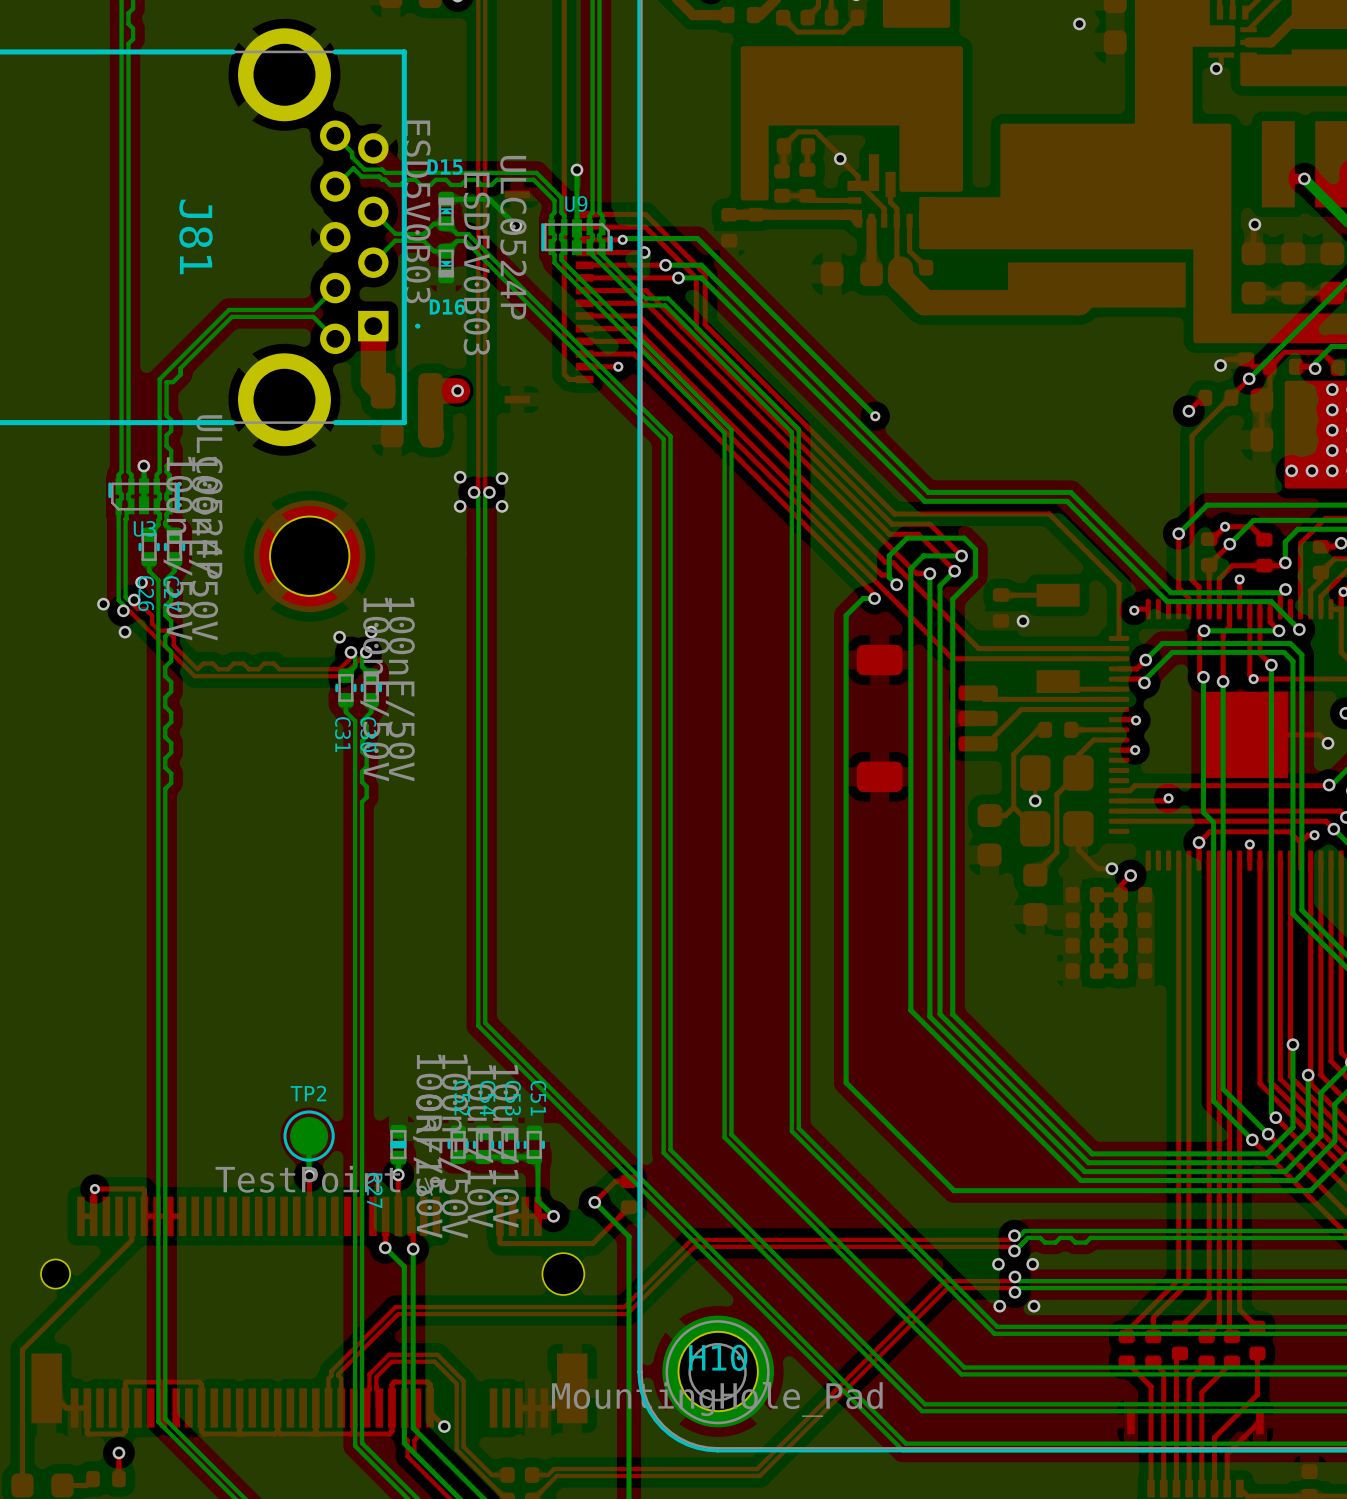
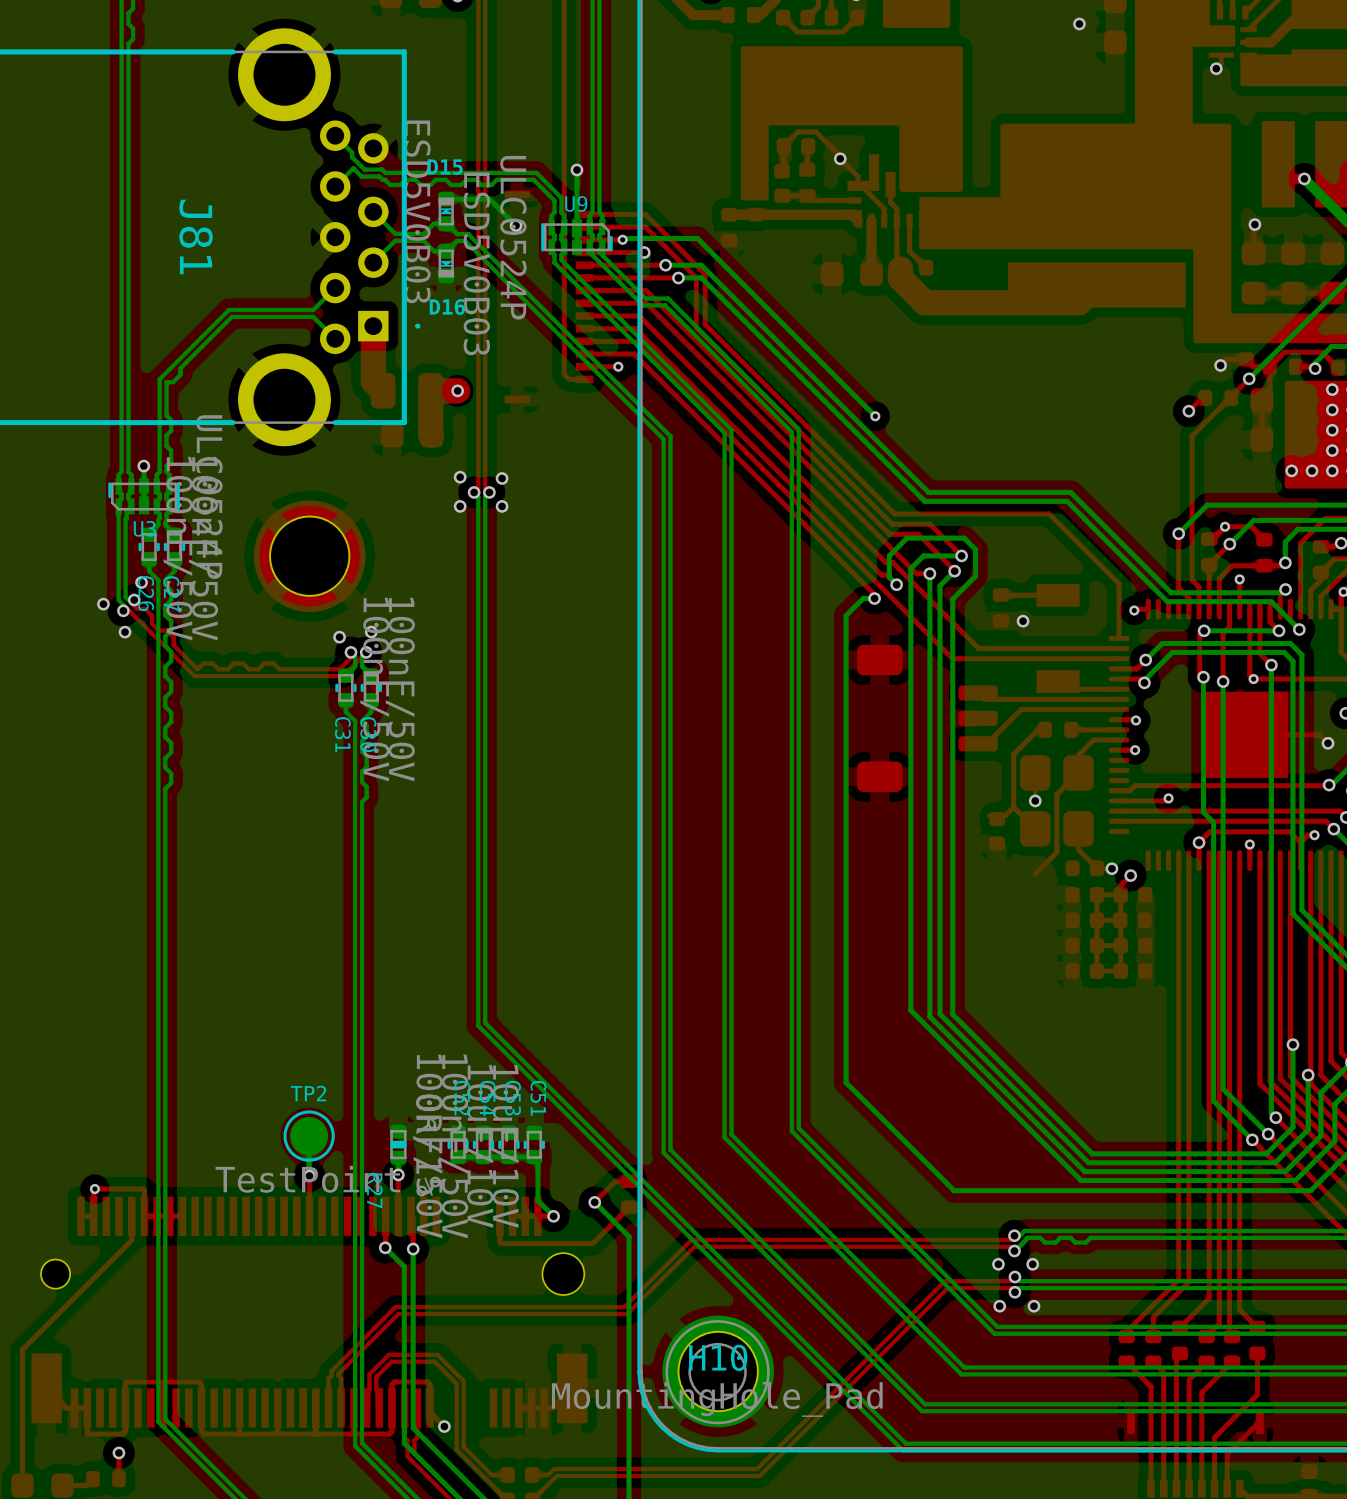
part footprint: [977, 804, 1002, 867] -> [989, 812, 1006, 851]
part: none -> (1084, 868)
part: (1035, 894) -> none

